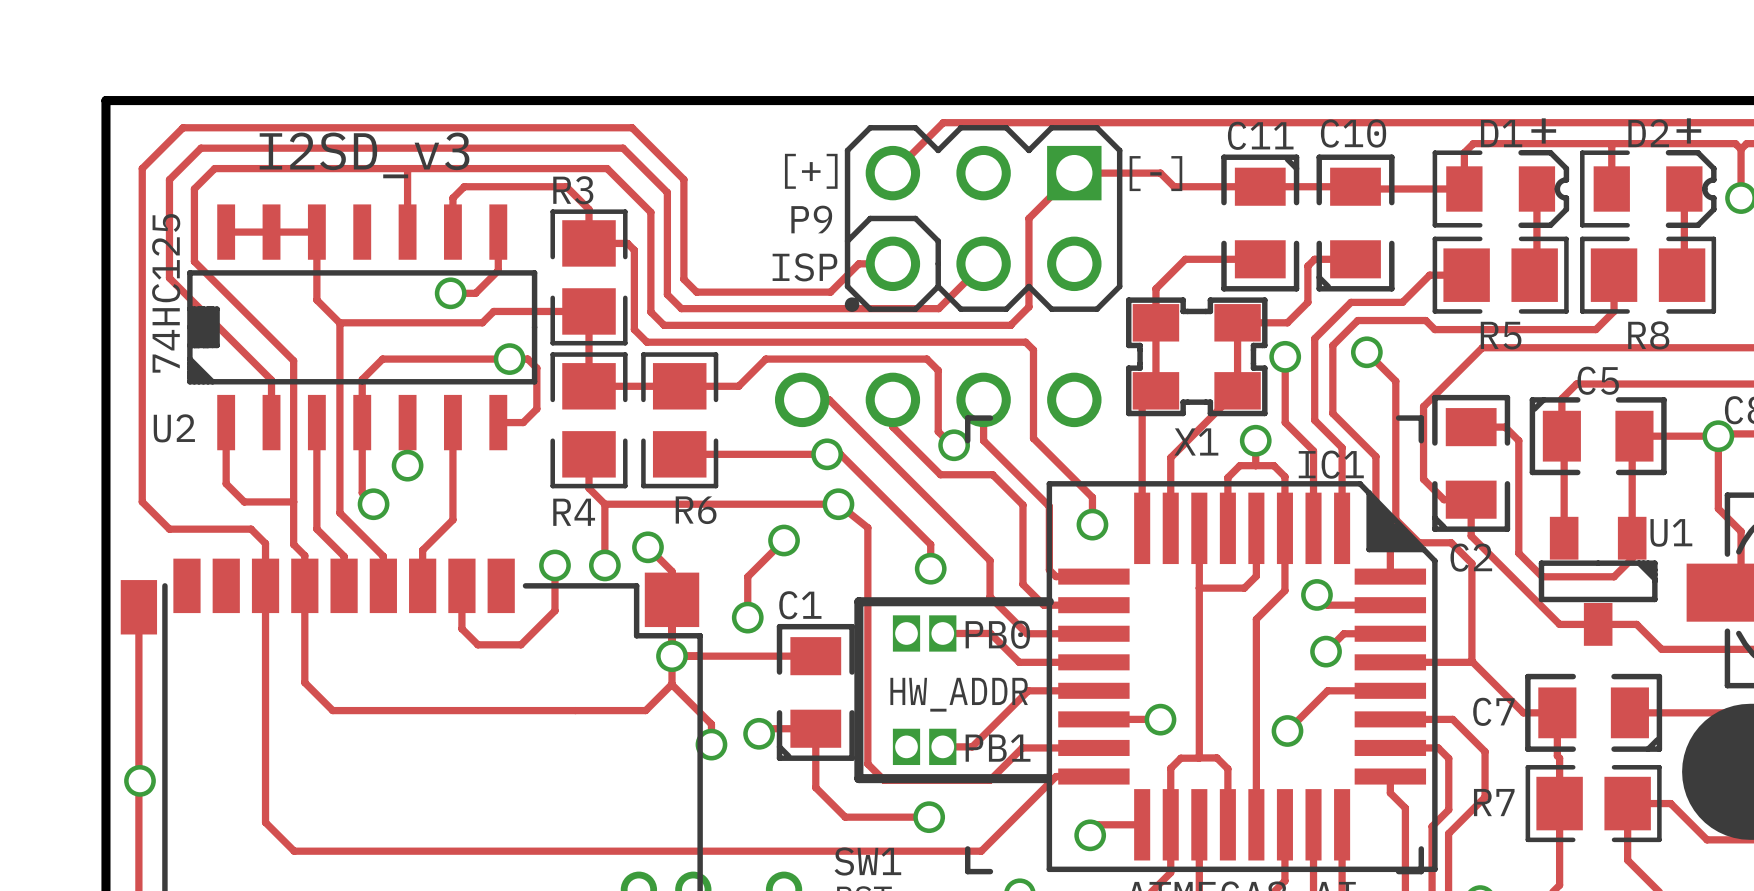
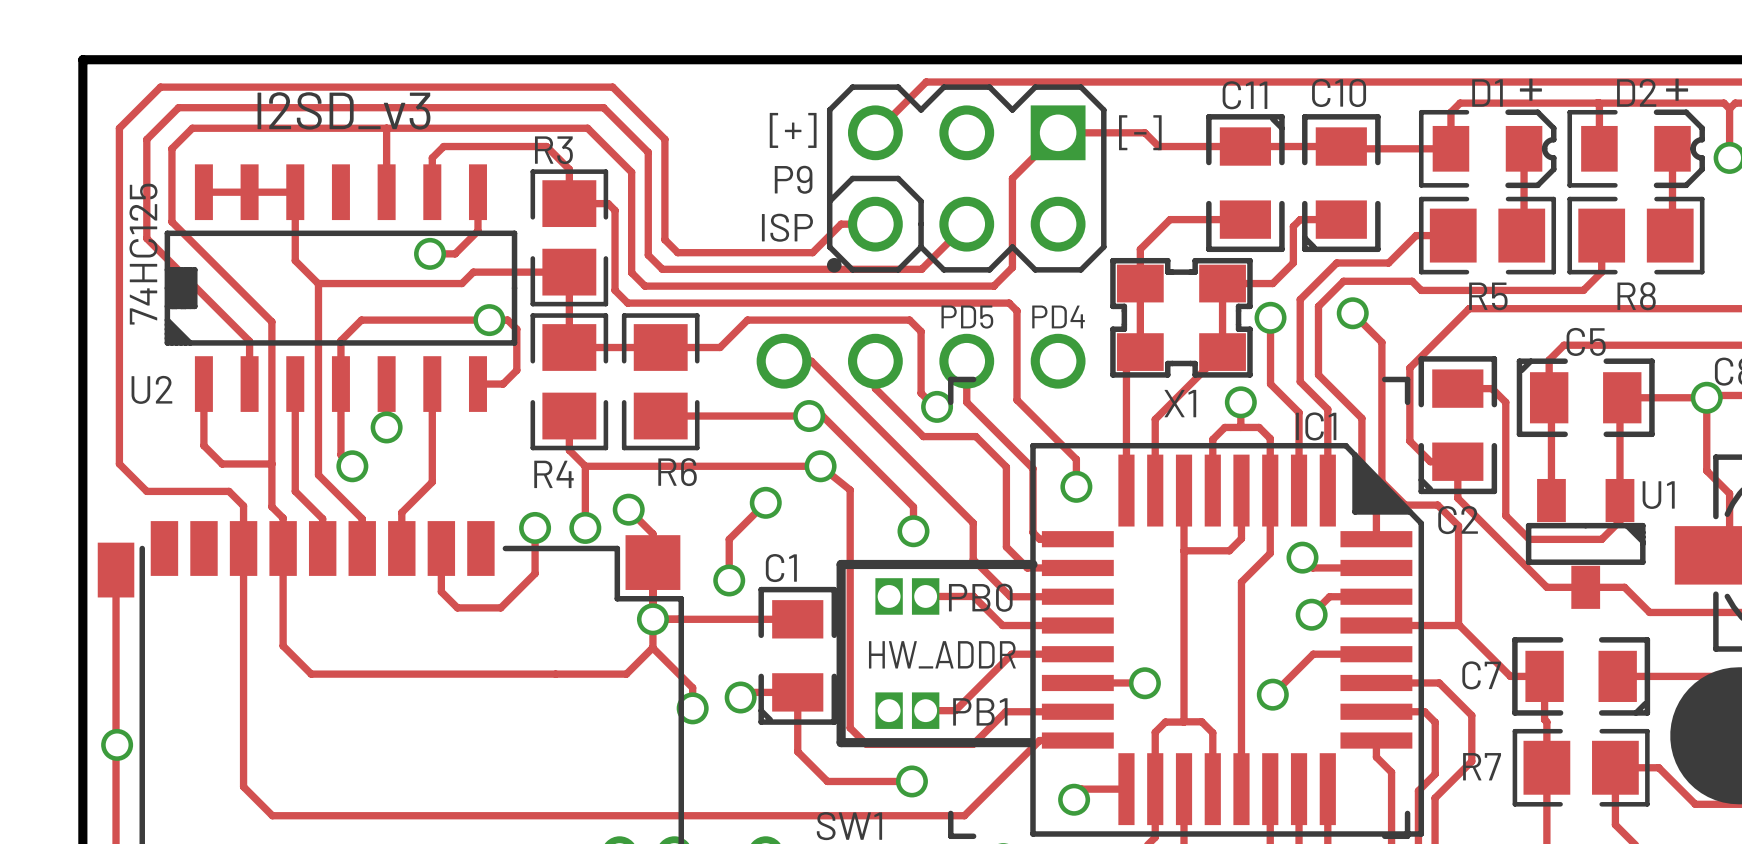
text: none -> PD4 (1058, 316)
text: none -> PD5 (967, 317)

